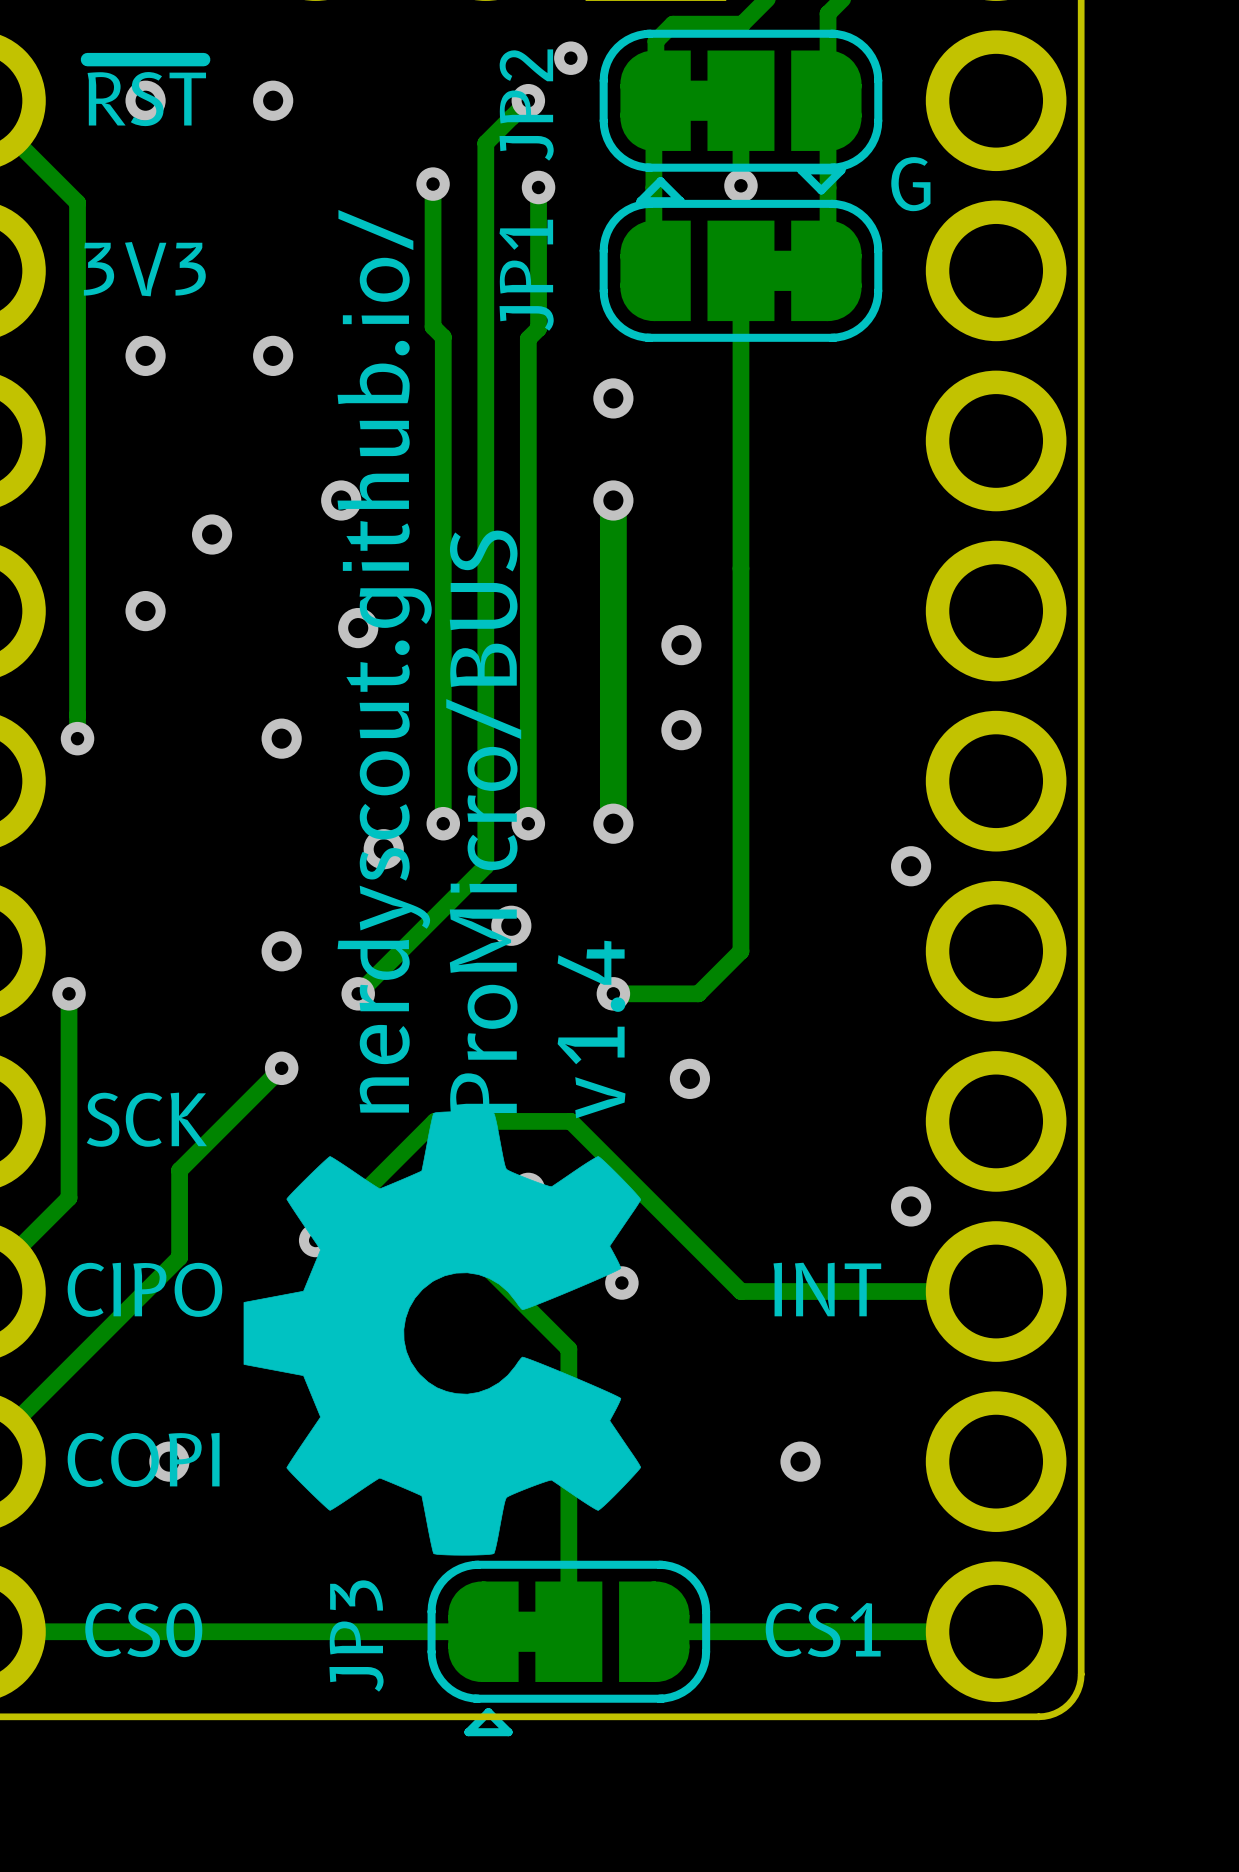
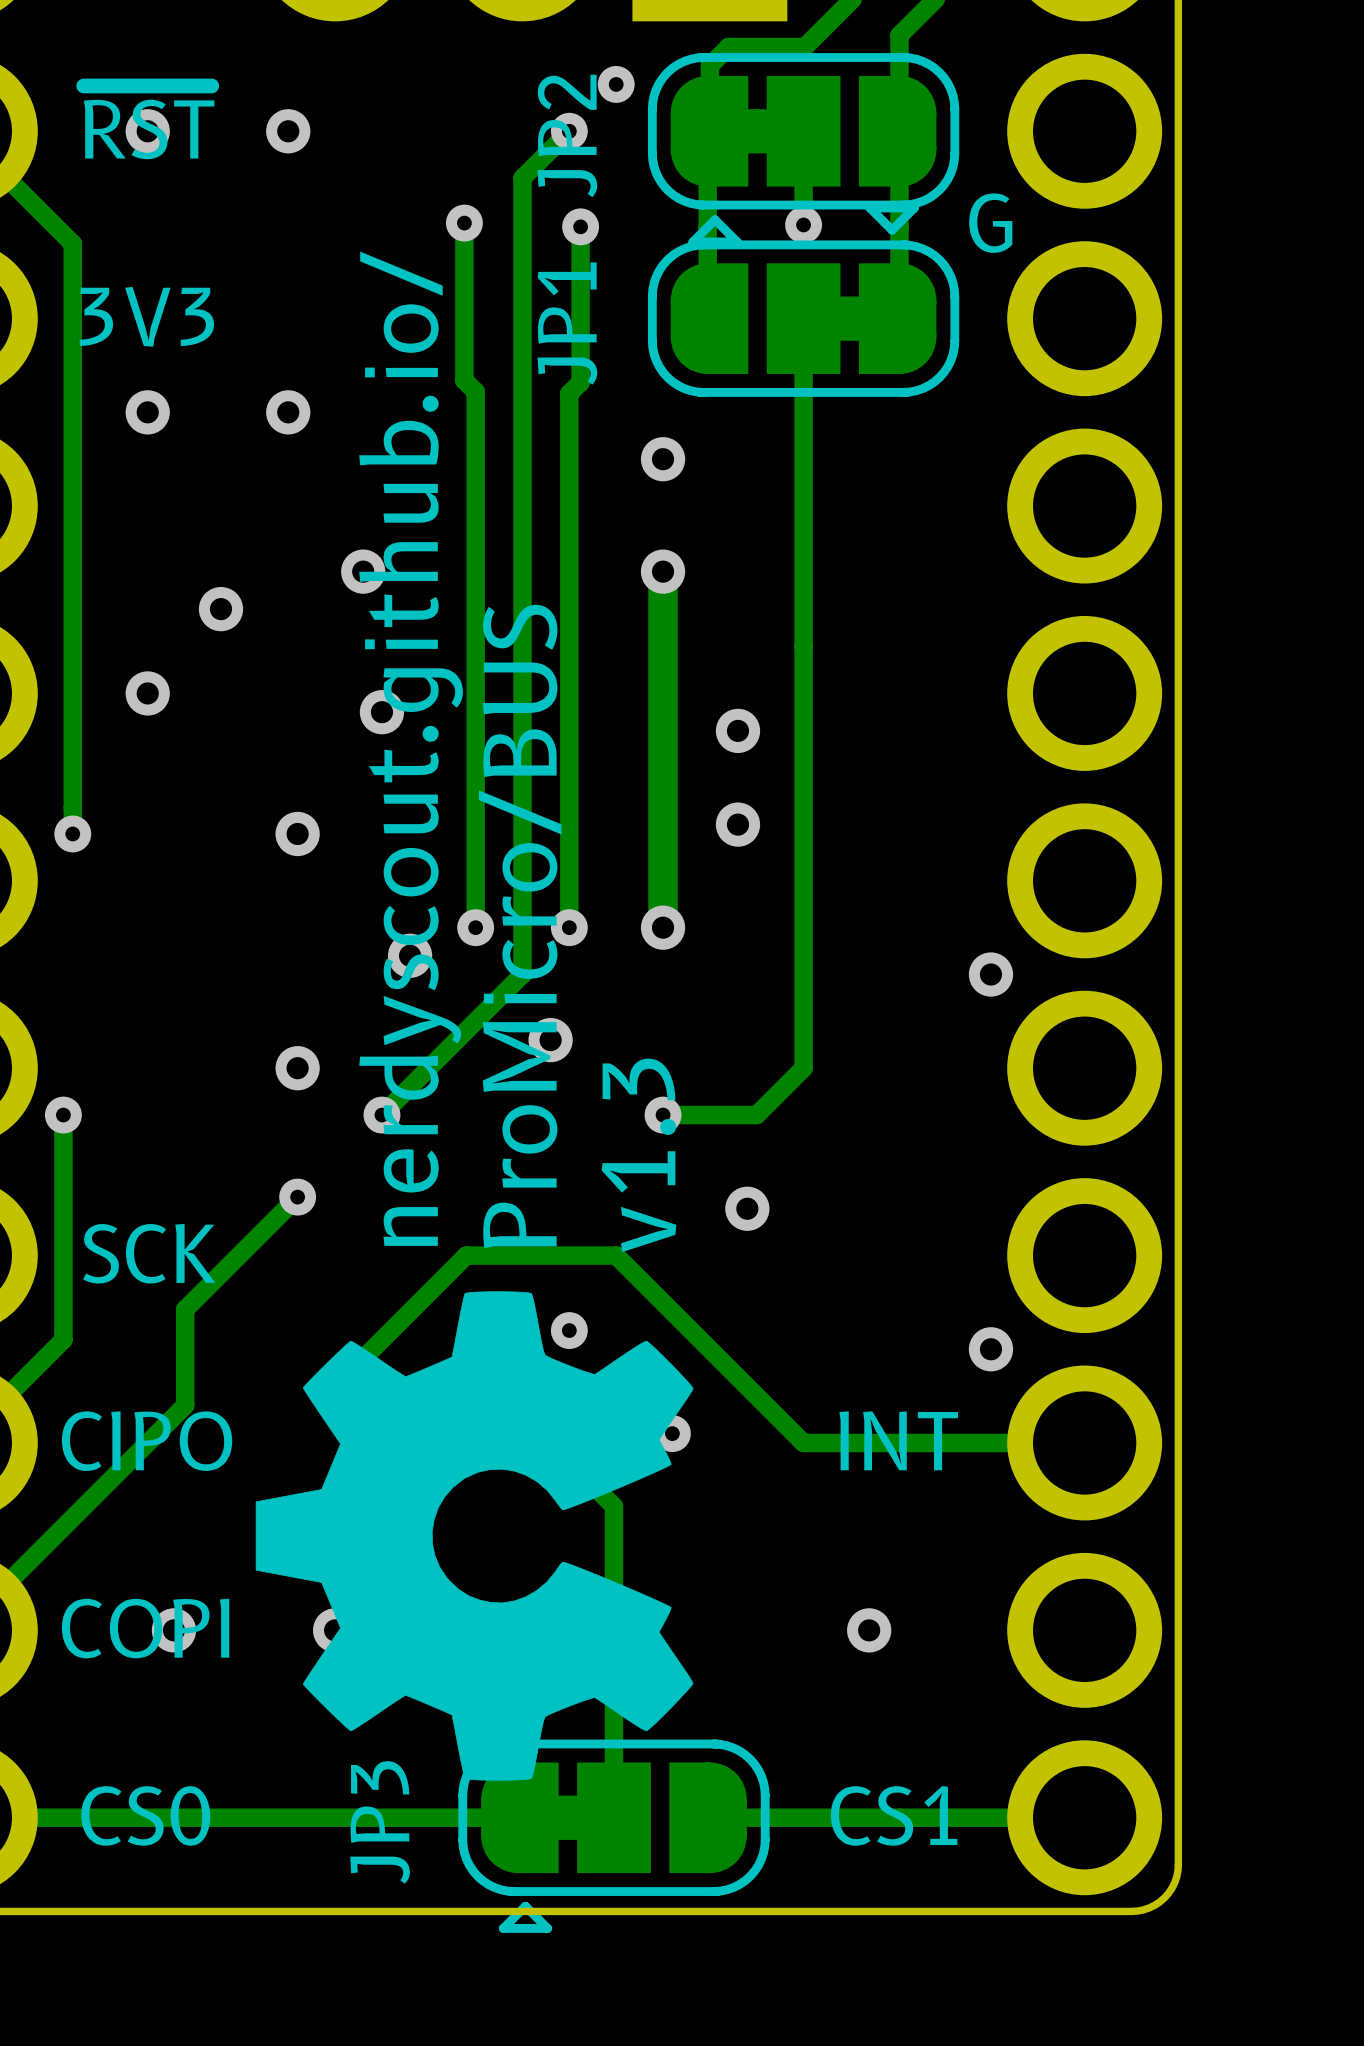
text: v1.4 (591, 1029) -> v1.3 (639, 1155)
drawing position: (442, 1333) -> (474, 1536)

